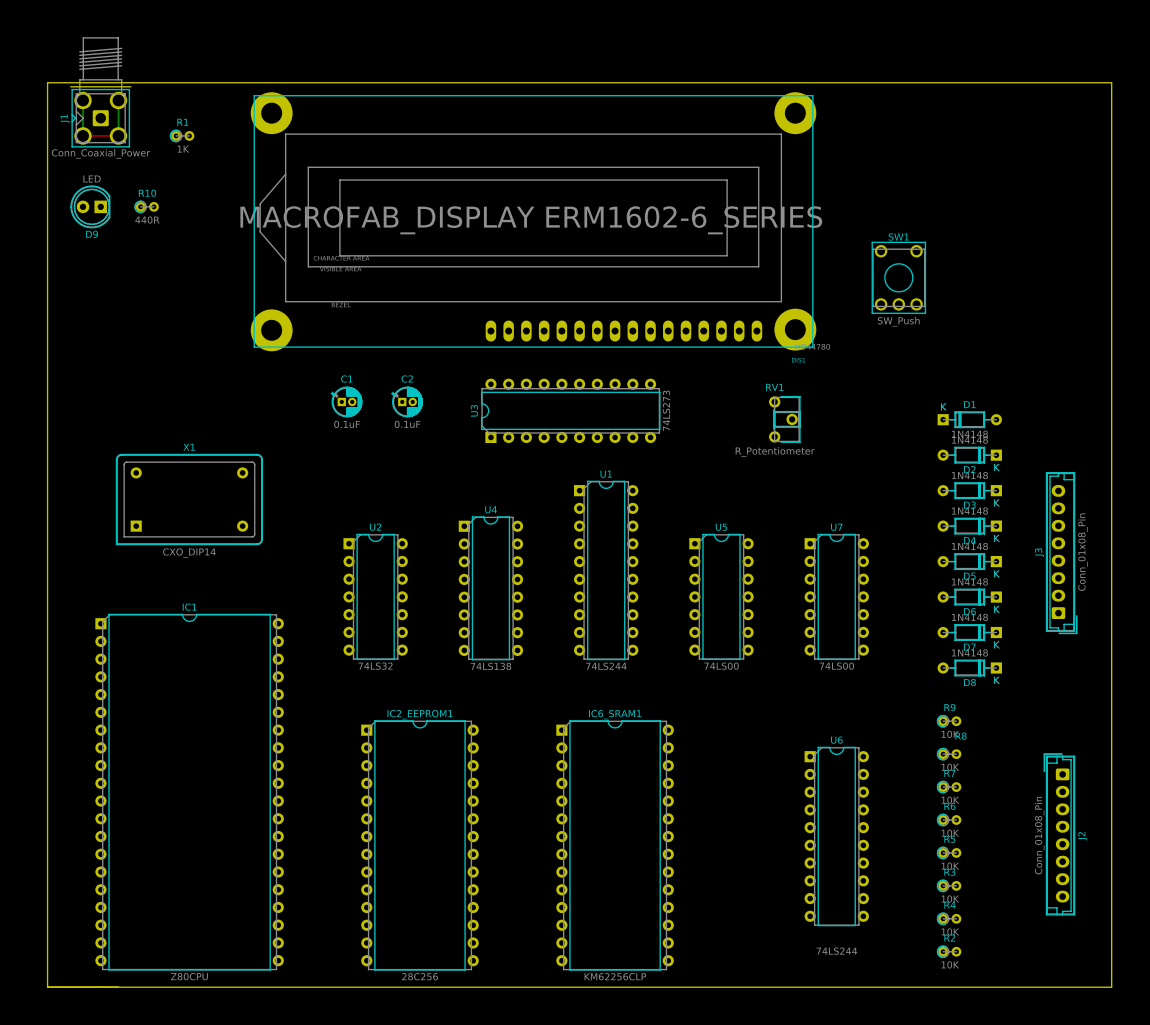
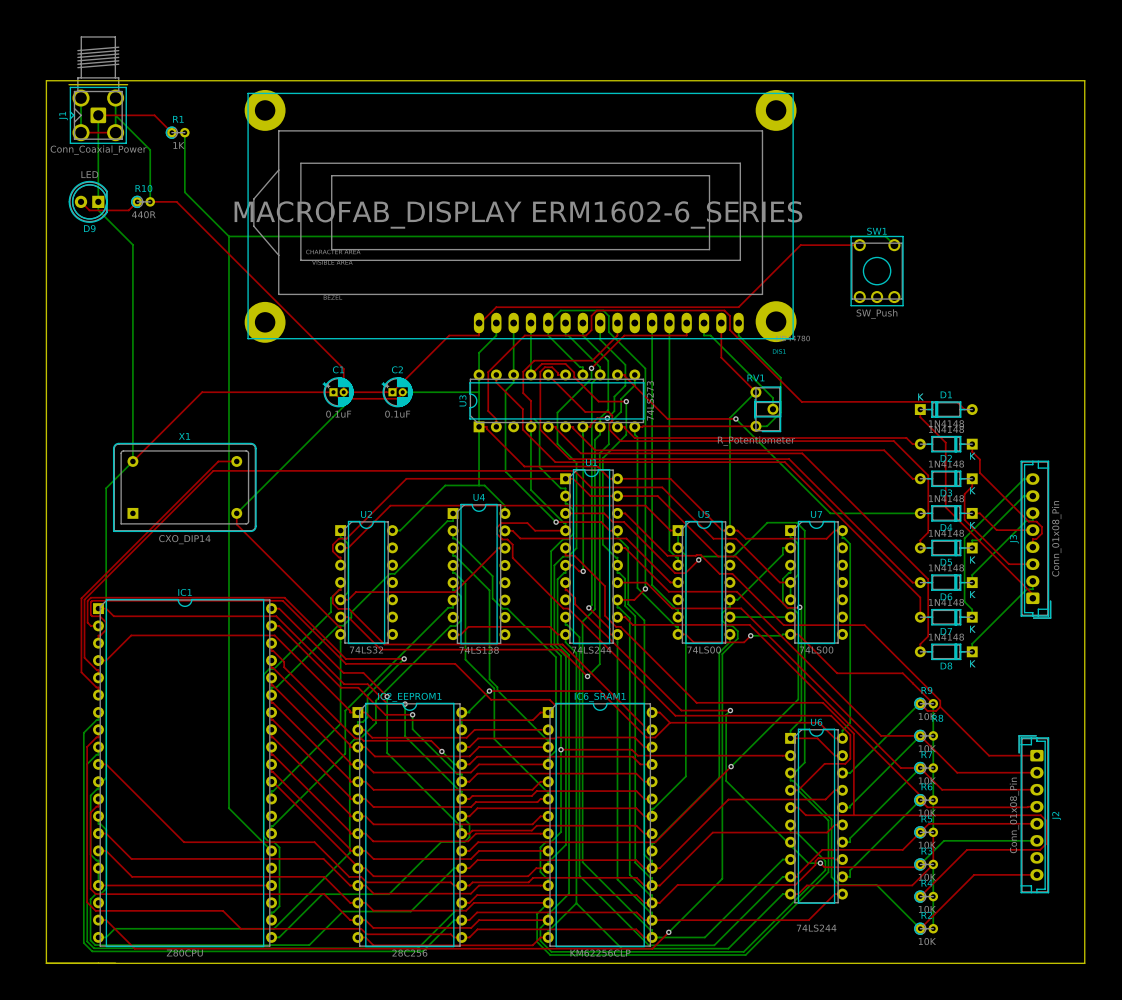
top track: none -> (98, 115) (154, 115) (171, 132)
bottom track: none -> (98, 115) (98, 210) (132, 244) (132, 461) (106, 488) (106, 777) (98, 785)
bottom track: none -> (115, 115) (150, 149) (150, 201)
bottom track: none -> (184, 132) (184, 192) (229, 236)
top track: none -> (81, 201) (89, 210) (128, 210) (137, 201)
top track: none -> (150, 201) (176, 201) (343, 368) (343, 392) (392, 392) (449, 335) (479, 335) (479, 323)
bottom track: none -> (229, 236) (229, 808) (271, 850)
bottom track: none -> (229, 236) (885, 236) (894, 245)
top track: none -> (859, 245) (800, 245) (738, 307) (496, 307) (479, 324)
bottom track: none -> (496, 323) (496, 335) (479, 352) (479, 485)
bottom track: none -> (513, 323) (513, 382) (505, 390) (505, 471) (556, 522)
bottom track: none -> (530, 323) (530, 374)
bottom track: none -> (565, 323) (565, 335) (568, 335) (600, 367) (600, 374) (591, 383) (591, 604) (588, 607)
bottom track: none -> (582, 323) (582, 335) (608, 360) (608, 409) (600, 418) (600, 434) (594, 439) (594, 609) (581, 622) (582, 862) (652, 929) (652, 937) (704, 937) (782, 859) (790, 859)
bottom track: none -> (600, 323) (600, 339) (625, 364) (625, 385) (614, 396) (614, 411) (607, 418)
top track: none -> (617, 323) (617, 335) (592, 360) (534, 360) (523, 371) (523, 393) (530, 400) (530, 426)
bottom track: none -> (652, 323) (652, 585) (678, 609) (678, 617)
bottom track: none -> (669, 323) (669, 550) (678, 557) (678, 565)
top track: none -> (686, 323) (686, 335) (624, 335) (591, 368)
bottom track: none -> (704, 323) (704, 335) (710, 335) (772, 397) (772, 409)
top track: none -> (721, 323) (721, 357) (755, 392)
bottom track: none -> (738, 323) (738, 335) (780, 377) (780, 412) (766, 426) (755, 426)
bottom track: none -> (591, 368) (591, 378) (557, 412) (557, 443) (576, 462) (576, 548) (568, 556) (563, 556) (554, 565) (554, 644) (565, 656) (565, 844) (548, 860) (548, 868)
via: none -> (591, 368)
top track: none -> (496, 374) (496, 382) (522, 409) (522, 429) (555, 462) (784, 462) (920, 597) (920, 617)
top track: none -> (530, 374) (541, 363) (565, 363) (574, 372) (574, 377) (598, 401) (626, 401)
top track: none -> (548, 374) (585, 411) (608, 411) (612, 415) (609, 429) (620, 441) (893, 441) (928, 475) (928, 532) (920, 540) (920, 547)
top track: none -> (565, 374) (557, 374) (552, 367) (544, 367) (540, 371) (540, 429) (569, 459) (789, 459) (912, 582) (920, 582)
bottom track: none -> (582, 374) (582, 367) (580, 367) (548, 335) (548, 323) (560, 310) (603, 310) (608, 316) (608, 332) (645, 368) (645, 588)
top track: none -> (617, 374) (625, 374) (667, 418) (735, 418)
bottom track: none -> (634, 374) (634, 385) (621, 398) (621, 411) (608, 424) (608, 444) (599, 453) (599, 664) (587, 676)
bottom track: none -> (343, 392) (343, 406) (236, 513)
top track: none -> (402, 392) (397, 398) (340, 398) (333, 392) (202, 392) (132, 461)
bottom track: none -> (402, 392) (479, 392)
bottom track: none -> (755, 392) (729, 417) (729, 530)
bottom track: none -> (626, 401) (626, 434) (602, 458) (602, 544) (617, 557) (617, 572) (625, 578) (625, 605) (635, 616) (635, 862) (652, 877) (652, 885)
via: none -> (626, 401)
top track: none -> (920, 409) (920, 417) (945, 442) (945, 507) (1032, 594) (1032, 598)
top track: none -> (972, 409) (964, 409) (956, 401) (801, 401) (729, 330) (729, 316) (724, 310) (596, 310) (591, 315) (591, 330) (586, 335) (524, 335) (488, 372) (488, 411) (496, 419) (496, 426)
top track: none -> (607, 418) (597, 418) (590, 426) (582, 426)
via: none -> (607, 418)
bottom track: none -> (534, 419) (539, 424) (539, 467) (560, 488) (565, 488) (565, 503) (573, 509) (573, 533) (568, 539) (563, 539) (551, 551) (551, 646) (561, 655) (561, 832) (550, 842) (545, 842) (540, 847) (540, 871) (548, 877) (548, 885)
bottom track: none -> (735, 418) (830, 513) (920, 513)
via: none -> (735, 418)
top track: none -> (755, 426) (634, 426)
top track: none -> (479, 426) (486, 426) (524, 466) (597, 466) (609, 478) (670, 478) (722, 530) (737, 530) (745, 538) (826, 538) (834, 530) (842, 530)
bottom track: none -> (530, 426) (530, 489) (565, 523) (565, 530)
top track: none -> (548, 426) (555, 426) (580, 453) (802, 453) (928, 579) (928, 636) (920, 644) (920, 651)
top track: none -> (565, 426) (573, 426) (595, 450) (884, 450) (912, 478) (920, 478)
bottom track: none -> (582, 426) (583, 571)
top track: none -> (617, 426) (625, 426) (634, 438) (906, 438) (912, 444) (920, 444)
bottom track: none -> (634, 426) (634, 434) (637, 437) (637, 588) (678, 626) (678, 634)
top track: none -> (972, 444) (972, 451) (979, 459) (979, 472) (1028, 521) (1036, 521) (1041, 526) (1041, 533) (1036, 539) (1032, 539) (1032, 547)
top track: none -> (236, 461) (218, 461) (81, 598) (81, 672) (98, 687) (98, 695)
top track: none -> (972, 478) (972, 486) (964, 494) (964, 519) (1008, 564) (1032, 564)
bottom track: none -> (1032, 479) (1023, 479) (964, 538) (964, 601) (972, 609) (972, 617)
bottom track: none -> (1032, 496) (1023, 496) (979, 540) (972, 540) (972, 547)
bottom track: none -> (1032, 513) (1032, 521) (1026, 521) (972, 574) (972, 582)
top track: none -> (236, 513) (236, 524) (340, 626) (340, 634)
bottom track: none -> (453, 513) (453, 521) (447, 521) (394, 573) (389, 573) (351, 612) (351, 617) (343, 625) (338, 625) (276, 687) (271, 687) (271, 695)
bottom track: none -> (505, 513) (505, 505) (484, 485) (445, 485) (400, 530) (392, 530)
top track: none -> (565, 513) (604, 513) (612, 522) (623, 522) (675, 573) (685, 573) (698, 559)
top track: none -> (617, 513) (625, 513) (667, 555) (700, 555) (719, 573) (732, 573) (783, 625) (864, 625) (940, 700) (940, 706)
top track: none -> (972, 513) (979, 513) (996, 530) (1032, 530)
top track: none -> (556, 522) (601, 522) (609, 530) (617, 530)
via: none -> (556, 522)
bottom track: none -> (340, 530) (340, 538) (348, 543) (348, 592) (340, 599)
bottom track: none -> (453, 530) (453, 538) (492, 576) (492, 598) (502, 608) (507, 608) (555, 657) (555, 750) (548, 756) (548, 764)
top track: none -> (505, 530) (512, 530) (520, 538) (626, 538) (670, 582) (678, 582)
top track: none -> (565, 530) (535, 530) (527, 523) (501, 523) (496, 527) (496, 533) (512, 544) (512, 557) (563, 608) (568, 608) (675, 715) (831, 715) (850, 734) (850, 758) (845, 763) (824, 763) (798, 790) (790, 790)
bottom track: none -> (617, 530) (617, 538) (628, 547) (628, 604) (644, 620) (644, 854) (652, 860) (652, 868)
top track: none -> (678, 530) (670, 530) (645, 505) (390, 505) (348, 547) (340, 547)
bottom track: none -> (678, 530) (678, 547) (685, 555) (685, 776) (652, 808) (652, 816)
bottom track: none -> (790, 530) (790, 538) (798, 543) (798, 574) (790, 582) (790, 599)
bottom track: none -> (842, 530) (842, 538) (850, 544) (850, 722) (842, 730) (842, 738)
bottom track: none -> (453, 548) (453, 555) (489, 590) (489, 679) (497, 687) (497, 690) (548, 739) (548, 747)
top track: none -> (505, 548) (497, 548) (454, 592) (355, 592) (348, 599) (340, 599)
top track: none -> (565, 547) (565, 555) (574, 555) (604, 586) (604, 615) (616, 626) (620, 626) (696, 702) (822, 702) (853, 733) (853, 815)
top track: none -> (617, 547) (625, 547) (668, 591) (736, 591) (881, 735) (920, 735) (957, 772) (1036, 772)
bottom track: none -> (790, 547) (782, 547) (782, 554) (737, 599) (729, 599) (729, 607) (722, 613) (722, 620) (737, 631) (737, 638) (722, 654) (722, 878) (668, 932)
bottom track: none -> (698, 559) (702, 556) (733, 556) (767, 522) (796, 522) (804, 530) (804, 762) (790, 776)
via: none -> (698, 559)
top track: none -> (340, 565) (340, 557) (332, 551) (332, 544) (338, 538) (346, 538) (406, 478) (573, 478) (590, 496) (657, 496) (718, 556) (736, 556) (787, 607) (799, 607)
bottom track: none -> (453, 565) (453, 573) (465, 583) (465, 659) (494, 688) (494, 739) (548, 791) (548, 799)
top track: none -> (565, 565) (573, 565) (579, 571) (583, 571)
bottom track: none -> (565, 565) (565, 572) (557, 579) (557, 643) (569, 654) (569, 893) (548, 912) (548, 920) (540, 927) (540, 940) (551, 951) (743, 951) (825, 870) (825, 861) (796, 832) (790, 832) (790, 824)
bottom track: none -> (790, 565) (790, 572) (782, 578) (782, 603) (798, 613) (798, 699) (731, 766)
via: none -> (583, 571)
bottom track: none -> (1032, 581) (1032, 589) (1026, 589) (972, 643) (972, 651)
top track: none -> (340, 582) (340, 590) (332, 596) (332, 603) (338, 608) (349, 608) (384, 644) (562, 644) (644, 726) (644, 729) (652, 729)
bottom track: none -> (340, 582) (340, 590) (330, 598) (330, 611) (273, 669) (269, 669) (263, 674) (263, 836) (279, 847) (279, 906) (271, 912) (271, 920)
top track: none -> (790, 582) (779, 582) (736, 538) (713, 538) (662, 487) (591, 487) (574, 470) (213, 470) (84, 599) (84, 657) (98, 670) (98, 677)
bottom track: none -> (453, 582) (453, 590) (461, 596) (461, 620) (455, 626) (450, 626) (375, 700) (375, 723) (359, 739) (354, 739) (349, 744) (349, 852) (273, 928) (114, 928) (106, 937) (98, 937)
top track: none -> (565, 582) (565, 590) (575, 598) (575, 604) (681, 710) (730, 710)
top track: none -> (617, 582) (646, 582) (672, 608) (741, 608) (900, 768) (920, 768) (942, 789) (1036, 789)
top track: none -> (645, 588) (634, 599) (617, 599)
via: none -> (645, 588)
bottom track: none -> (453, 600) (453, 607) (448, 607) (345, 710) (345, 753) (271, 825) (271, 833)
bottom track: none -> (617, 599) (617, 607) (629, 618) (629, 874) (652, 895) (652, 902)
top track: none -> (588, 607) (609, 628) (609, 634) (617, 634)
via: none -> (588, 607)
bottom track: none -> (799, 607) (801, 608) (801, 719) (790, 730) (790, 738)
via: none -> (799, 607)
top track: none -> (98, 608) (106, 608) (113, 616) (276, 616) (344, 684) (367, 684) (387, 704) (405, 704)
top track: none -> (271, 608) (279, 608) (343, 672) (363, 672) (387, 696)
top track: none -> (340, 617) (348, 617) (380, 649) (560, 649) (587, 676)
bottom track: none -> (565, 617) (565, 624) (579, 637) (579, 875) (648, 945) (714, 945) (782, 876) (790, 876)
top track: none -> (617, 617) (625, 617) (632, 624) (749, 624) (920, 795) (920, 800) (927, 807) (1036, 806)
bottom track: none -> (729, 617) (790, 617)
top track: none -> (98, 625) (90, 625) (87, 622) (87, 600) (90, 597) (284, 597) (345, 658) (404, 658)
top track: none -> (271, 625) (279, 625) (341, 687) (358, 687) (385, 714) (412, 714)
bottom track: none -> (340, 634) (340, 723) (271, 791) (271, 798)
top track: none -> (565, 634) (557, 634) (550, 626) (468, 626) (460, 634) (453, 634)
bottom track: none -> (565, 634) (565, 642) (576, 653) (576, 903)
bottom track: none -> (617, 634) (617, 879) (652, 912) (652, 920)
top track: none -> (678, 634) (685, 634) (693, 642) (744, 642) (750, 635)
bottom track: none -> (729, 634) (729, 642) (719, 652) (719, 777) (652, 843) (652, 850)
top track: none -> (790, 634) (798, 634) (837, 673) (902, 673) (933, 703)
bottom track: none -> (790, 634) (750, 635)
via: none -> (750, 635)
top track: none -> (98, 643) (98, 635) (106, 629) (106, 622) (99, 616) (90, 614) (92, 600) (282, 600) (345, 663) (455, 663) (491, 699) (549, 699) (556, 706) (556, 737)
top track: none -> (271, 643) (271, 650) (284, 661) (284, 667) (355, 738) (361, 738) (363, 740) (431, 740) (441, 751)
bottom track: none -> (404, 658) (367, 695) (367, 717) (362, 722) (357, 722) (357, 729)
via: none -> (404, 658)
top track: none -> (98, 660) (106, 660) (131, 635) (274, 635) (350, 712) (365, 712) (373, 720) (532, 720) (540, 712) (548, 712)
top track: none -> (271, 660) (271, 668) (350, 747) (365, 747) (374, 756) (469, 756) (479, 747) (548, 747)
via: none -> (587, 676)
top track: none -> (271, 677) (271, 685) (350, 764) (365, 764) (373, 772) (470, 772) (479, 764) (548, 764)
top track: none -> (489, 691) (600, 691) (646, 737) (655, 737) (670, 722)
bottom track: none -> (489, 691) (469, 712) (461, 712) (461, 729)
via: none -> (489, 691)
top track: none -> (271, 695) (271, 702) (350, 781) (365, 781) (373, 789) (532, 789) (540, 781) (548, 781)
bottom track: none -> (387, 696) (387, 752) (461, 825) (461, 833)
via: none -> (387, 696)
bottom track: none -> (405, 704) (405, 736) (461, 791) (461, 799)
via: none -> (405, 704)
top track: none -> (920, 703) (927, 710) (936, 710) (940, 706)
bottom track: none -> (920, 703) (850, 772) (842, 772)
bottom track: none -> (933, 703) (933, 832)
top track: none -> (940, 706) (989, 755) (1036, 755)
bottom track: none -> (730, 710) (726, 714) (726, 780) (808, 863) (820, 863)
via: none -> (730, 710)
bottom track: none -> (98, 712) (98, 720) (83, 732) (83, 942) (92, 951) (422, 951) (454, 920) (461, 920)
top track: none -> (271, 712) (271, 720) (350, 799) (365, 799) (373, 806) (471, 806) (475, 802) (537, 802) (540, 799) (548, 799)
top track: none -> (652, 712) (659, 712) (670, 722)
bottom track: none -> (412, 714) (412, 729) (457, 774) (461, 774) (461, 781)
via: none -> (412, 714)
top track: none -> (670, 722) (819, 722) (834, 738) (842, 738)
top track: none -> (98, 729) (98, 737) (87, 746) (87, 902) (95, 910) (223, 910) (240, 928) (361, 928) (366, 934) (450, 934) (454, 937) (469, 937) (477, 929) (636, 929) (644, 937) (652, 937)
top track: none -> (271, 729) (271, 737) (350, 816) (365, 816) (373, 824) (532, 824) (540, 816) (548, 816)
top track: none -> (357, 729) (364, 729) (372, 737) (466, 737) (474, 729) (541, 729)
bottom track: none -> (920, 735) (850, 807) (842, 807)
top track: none -> (556, 737) (634, 737) (644, 747) (652, 747)
top track: none -> (556, 737) (478, 738) (469, 747) (461, 747)
top track: none -> (790, 738) (817, 738) (834, 755) (842, 755)
bottom track: none -> (98, 747) (98, 754) (87, 764) (87, 941) (94, 948) (418, 948) (455, 910) (461, 910) (461, 902)
top track: none -> (271, 747) (271, 754) (350, 833) (365, 833) (373, 841) (468, 841) (475, 833) (548, 833)
top track: none -> (561, 749) (631, 749) (637, 755) (790, 755)
via: none -> (561, 749)
bottom track: none -> (441, 751) (454, 764) (461, 764)
via: none -> (441, 751)
top track: none -> (98, 764) (106, 764) (184, 842) (314, 842) (349, 876) (361, 876) (366, 882) (450, 882) (454, 885) (469, 885) (472, 882) (528, 882) (533, 877) (636, 877) (644, 885) (659, 885) (712, 832) (827, 832) (834, 824) (842, 824)
top track: none -> (271, 764) (271, 772) (350, 850) (365, 850) (373, 859) (470, 859) (479, 850) (548, 850)
top track: none -> (461, 764) (469, 764) (477, 756) (632, 756) (640, 764) (652, 764)
top track: none -> (731, 766) (655, 842) (478, 842) (469, 850) (461, 850)
via: none -> (731, 766)
bottom track: none -> (920, 768) (850, 838) (850, 842) (842, 842)
bottom track: none -> (790, 772) (790, 780) (792, 780) (831, 819) (831, 877) (839, 884) (876, 884) (920, 928)
bottom track: none -> (98, 781) (98, 789) (90, 795) (90, 854) (98, 860) (98, 885)
top track: none -> (271, 781) (359, 868)
top track: none -> (461, 781) (469, 781) (477, 773) (636, 773) (644, 781) (652, 781)
bottom track: none -> (790, 790) (798, 790) (828, 820) (828, 872) (745, 955) (550, 955) (537, 941) (537, 914) (548, 902)
top track: none -> (842, 790) (834, 790) (825, 799) (728, 799) (659, 868) (644, 868) (636, 860) (477, 860) (469, 868) (461, 868)
top track: none -> (98, 798) (98, 806) (90, 812) (90, 888) (95, 894) (324, 894) (350, 920) (365, 920) (373, 927) (471, 927) (479, 920) (548, 920)
top track: none -> (461, 799) (469, 799) (472, 795) (531, 795) (536, 791) (636, 791) (644, 799) (652, 799)
bottom track: none -> (920, 800) (850, 870) (850, 876) (842, 876)
top track: none -> (790, 807) (798, 807) (805, 815) (1040, 815) (1046, 820) (1046, 844) (1040, 849) (967, 849) (920, 896)
bottom track: none -> (98, 816) (98, 823) (106, 829) (106, 888) (90, 899) (90, 940) (95, 945) (309, 945) (342, 911) (410, 911) (454, 868) (461, 868)
top track: none -> (461, 816) (469, 816) (477, 808) (636, 808) (644, 816) (652, 816)
bottom track: none -> (461, 816) (469, 824) (469, 837) (464, 842) (441, 842) (389, 894) (322, 894) (279, 937) (271, 937)
top track: none -> (1036, 823) (928, 823) (902, 849) (822, 849) (798, 874) (798, 876) (790, 876)
top track: none -> (933, 832) (933, 864) (912, 885) (806, 885) (798, 894) (790, 894)
top track: none -> (98, 833) (106, 833) (131, 858) (323, 858) (350, 885) (365, 885) (373, 893) (470, 893) (479, 885) (548, 885)
top track: none -> (461, 833) (469, 833) (472, 830) (531, 830) (536, 825) (636, 825) (644, 833) (652, 833)
bottom track: none -> (1036, 840) (943, 840) (920, 864)
top track: none -> (98, 850) (106, 850) (132, 876) (324, 876) (350, 902) (365, 902) (373, 910) (466, 910) (474, 902) (548, 902)
top track: none -> (842, 859) (818, 858) (815, 864) (795, 884) (677, 884) (659, 902) (644, 902) (636, 895) (477, 895) (469, 902) (461, 902)
top track: none -> (820, 863) (824, 867) (917, 867) (920, 864)
via: none -> (820, 863)
bottom track: none -> (933, 864) (933, 928)
top track: none -> (357, 868) (365, 868) (373, 876) (528, 876) (536, 868) (548, 868)
top track: none -> (1036, 874) (974, 874) (920, 928)
top track: none -> (98, 885) (271, 885)
bottom track: none -> (790, 894) (782, 894) (728, 948) (621, 948) (576, 903)
top track: none -> (842, 894) (834, 894) (808, 920) (644, 920) (636, 912) (477, 912) (469, 920) (461, 920)
bottom track: none -> (576, 903) (548, 929) (548, 937)
top track: none -> (98, 920) (106, 920) (134, 948) (652, 948) (668, 932)
via: none -> (668, 932)
top track: none -> (357, 937) (365, 937) (373, 945) (532, 945) (540, 937) (548, 937)

